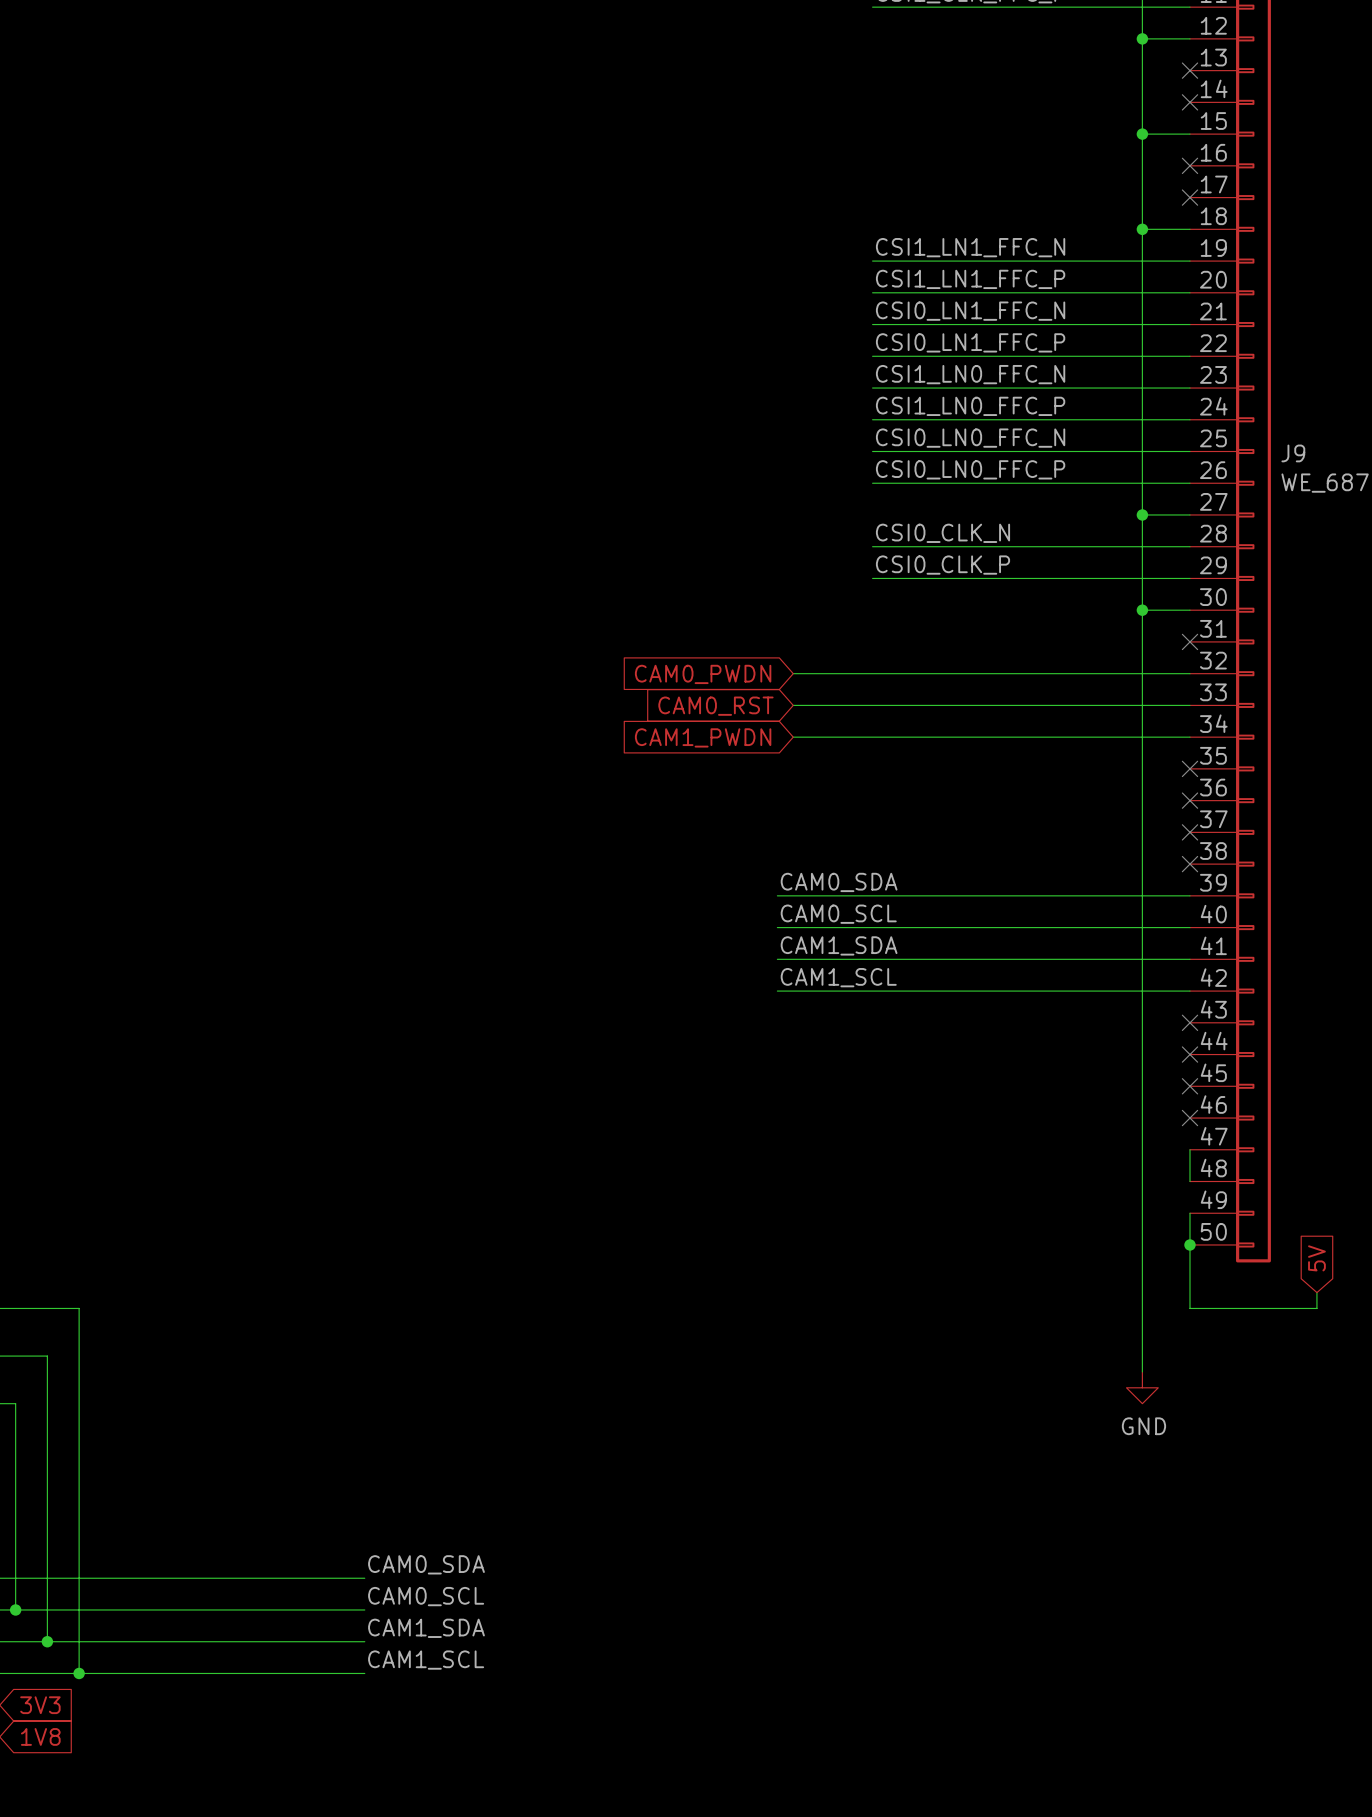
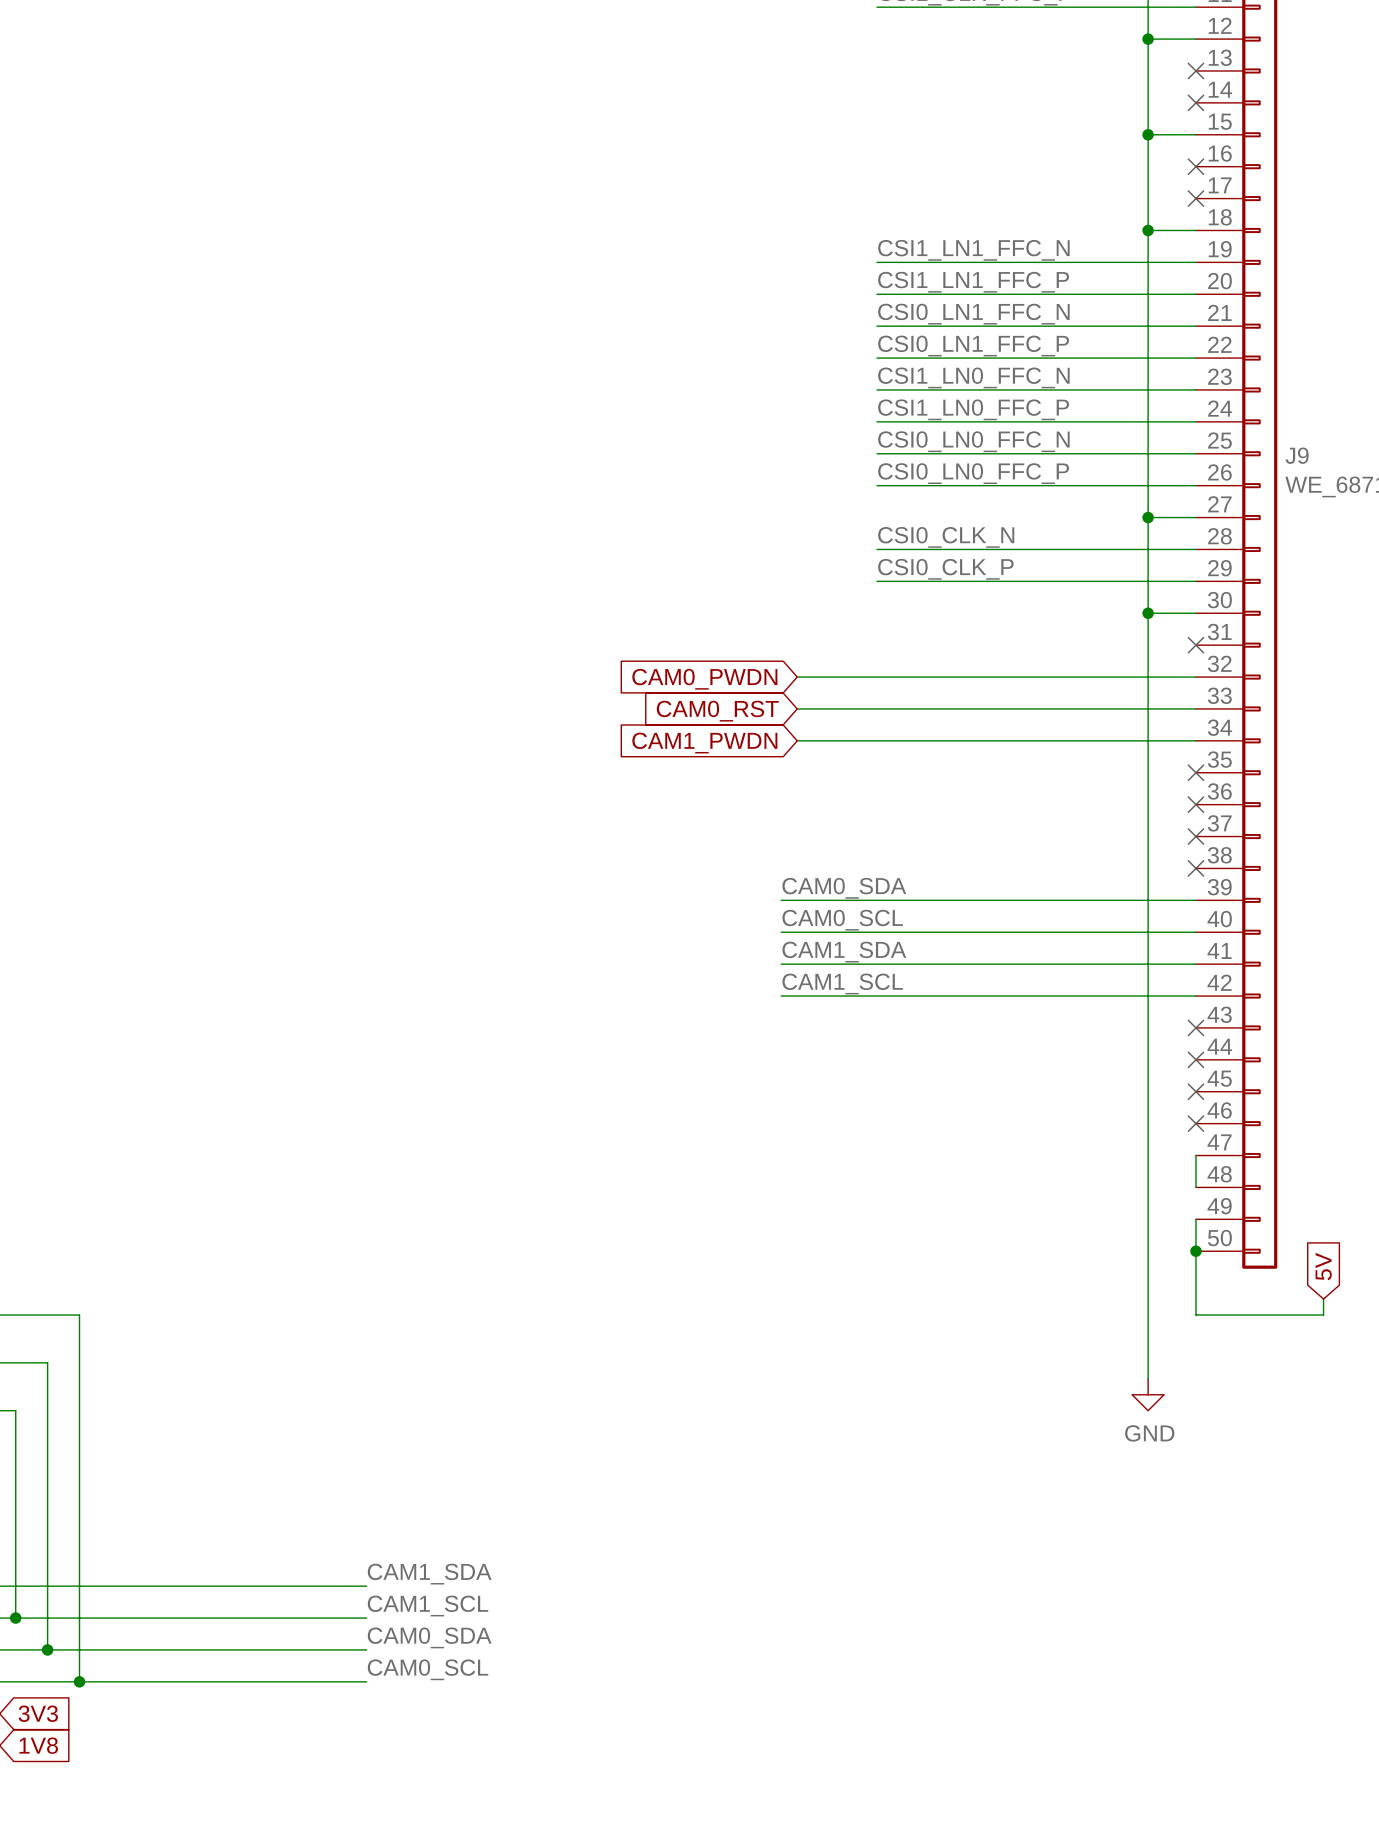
label: CAM0_SDA (426, 1564) -> CAM1_SDA (429, 1574)
label: CAM0_SCL (426, 1596) -> CAM1_SCL (428, 1606)
label: CAM1_SDA (426, 1628) -> CAM0_SDA (429, 1637)
label: CAM1_SCL (426, 1660) -> CAM0_SCL (428, 1669)

